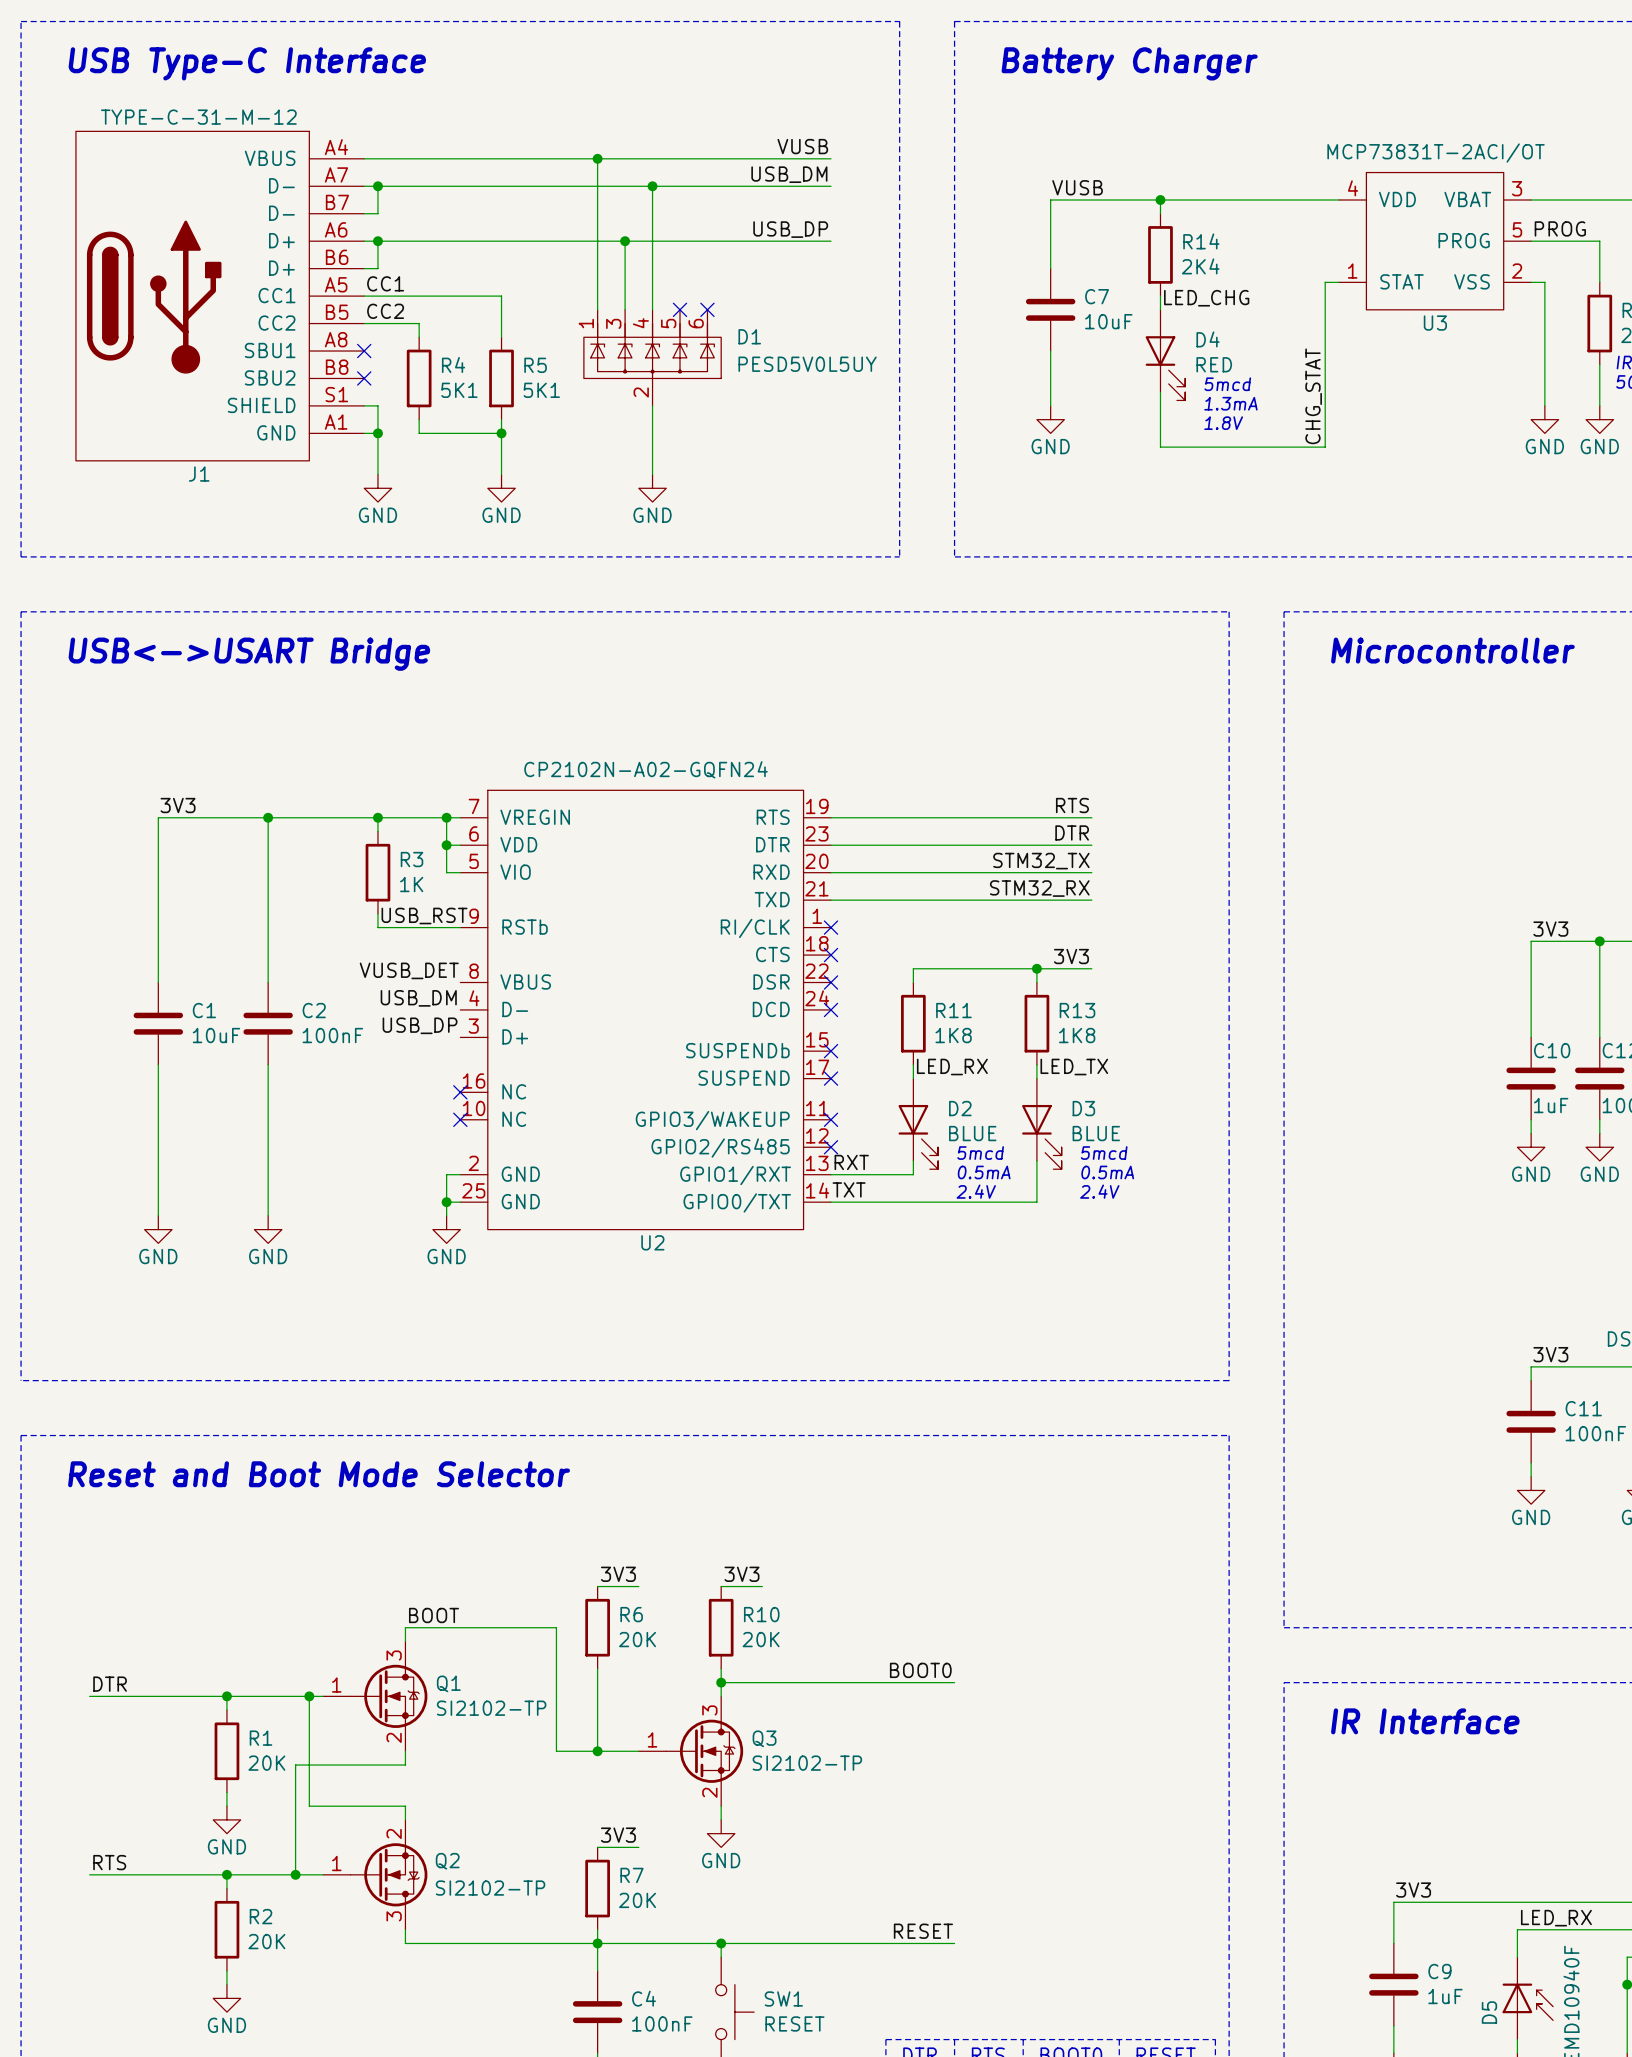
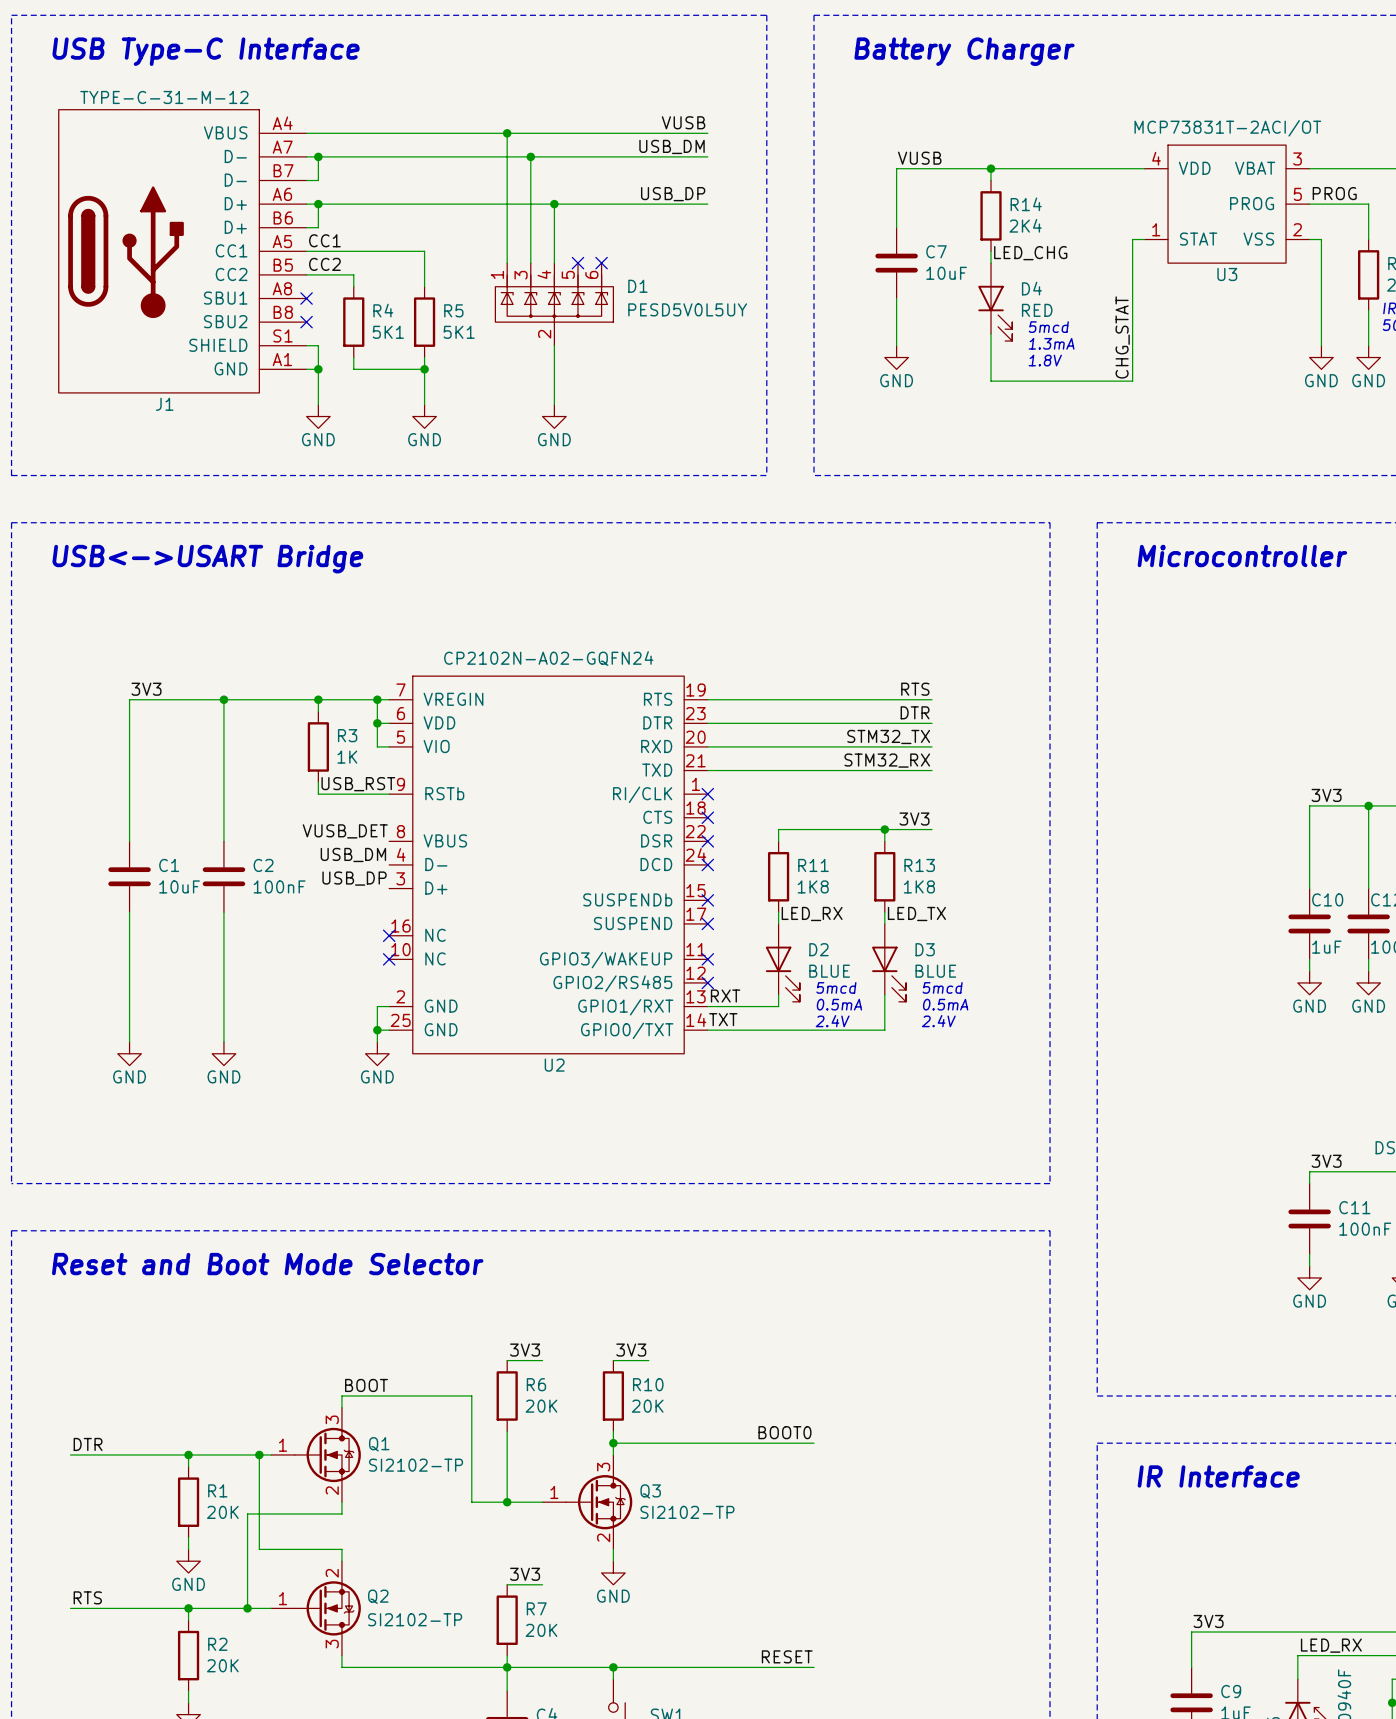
junction: none -> (530, 156)
wire: (652, 186) (652, 241) -> (530, 156) (530, 204)
junction: (652, 186) -> none
junction: (625, 241) -> none
junction: none -> (554, 204)

